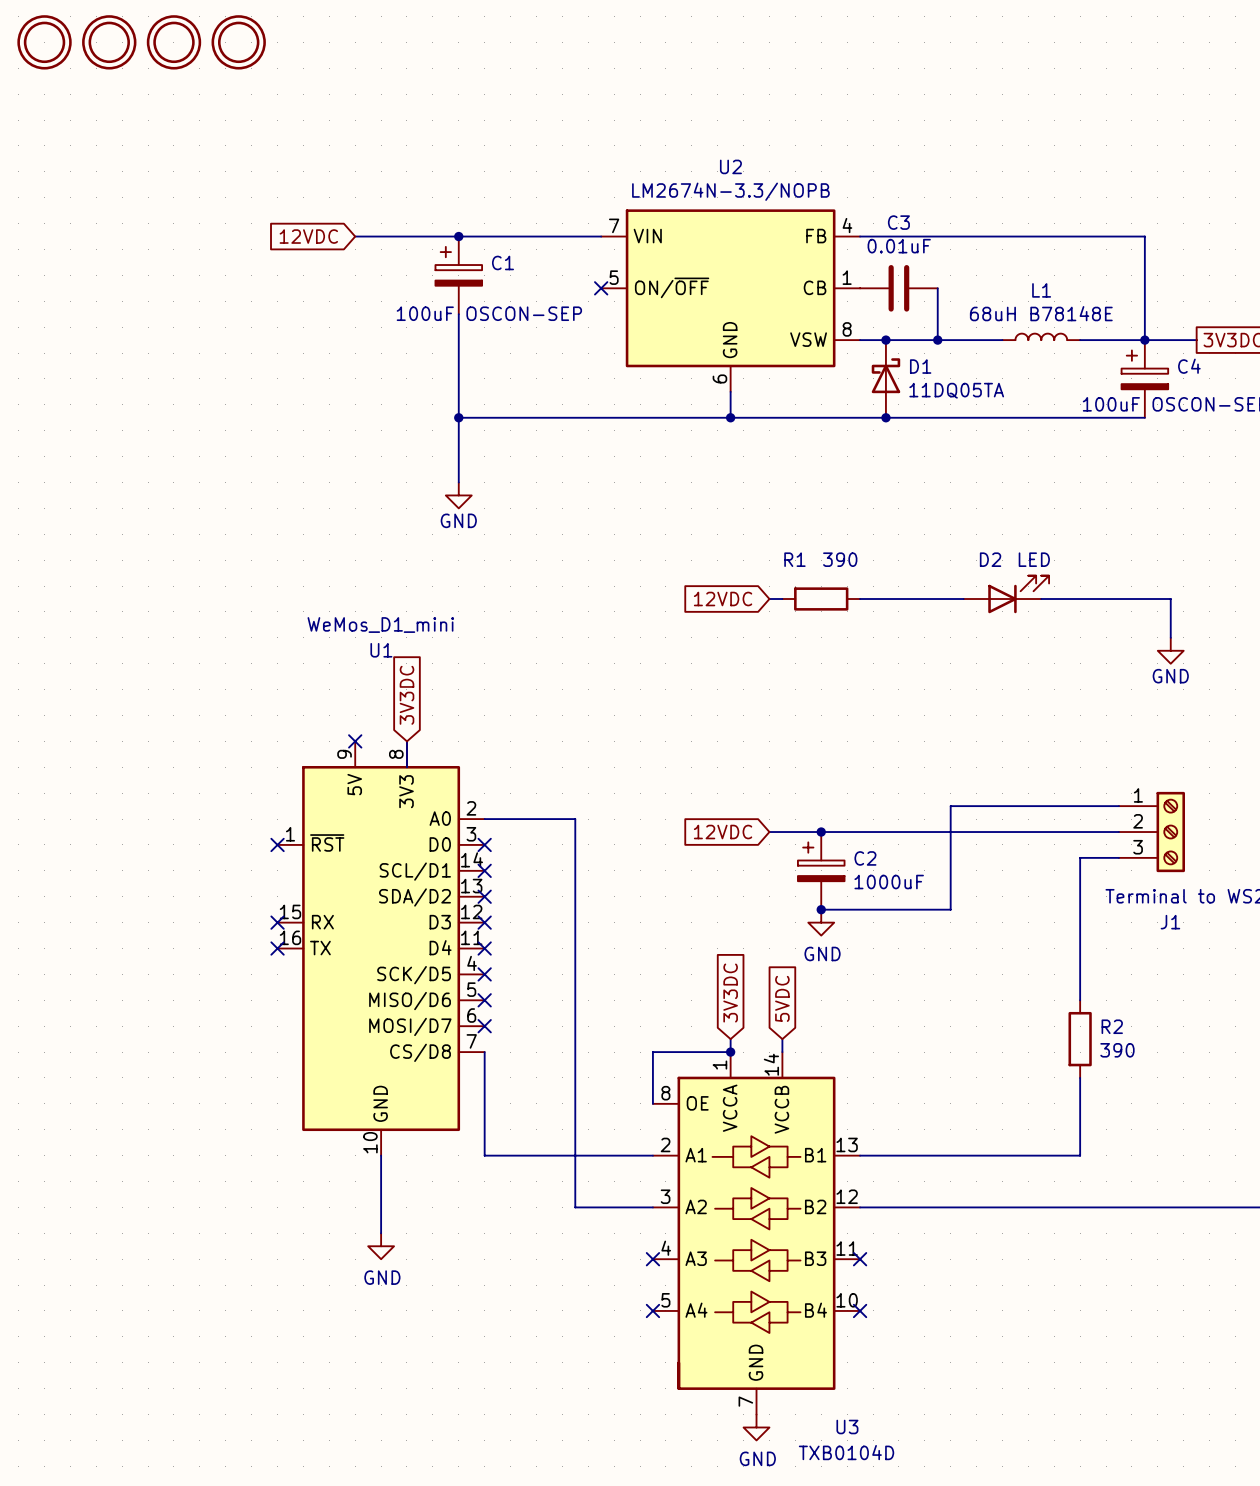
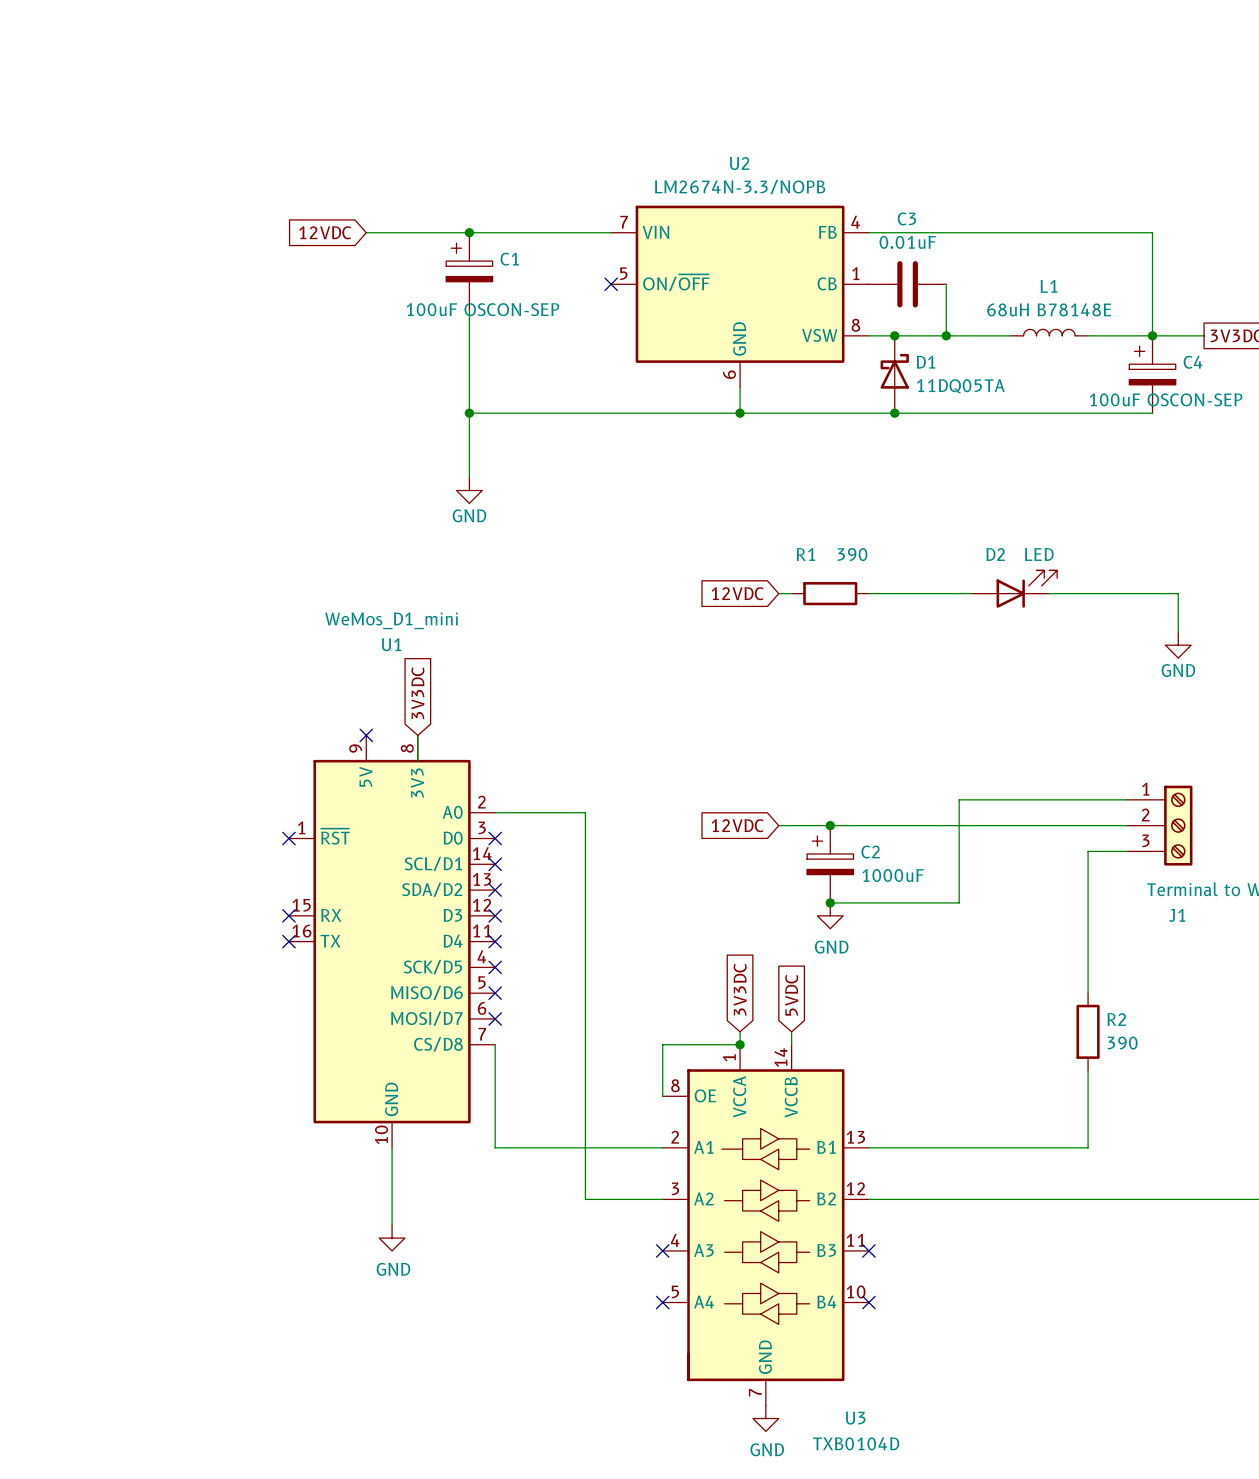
part: (44, 42) -> none
part: (109, 42) -> none
part: (173, 42) -> none
part: (238, 42) -> none

